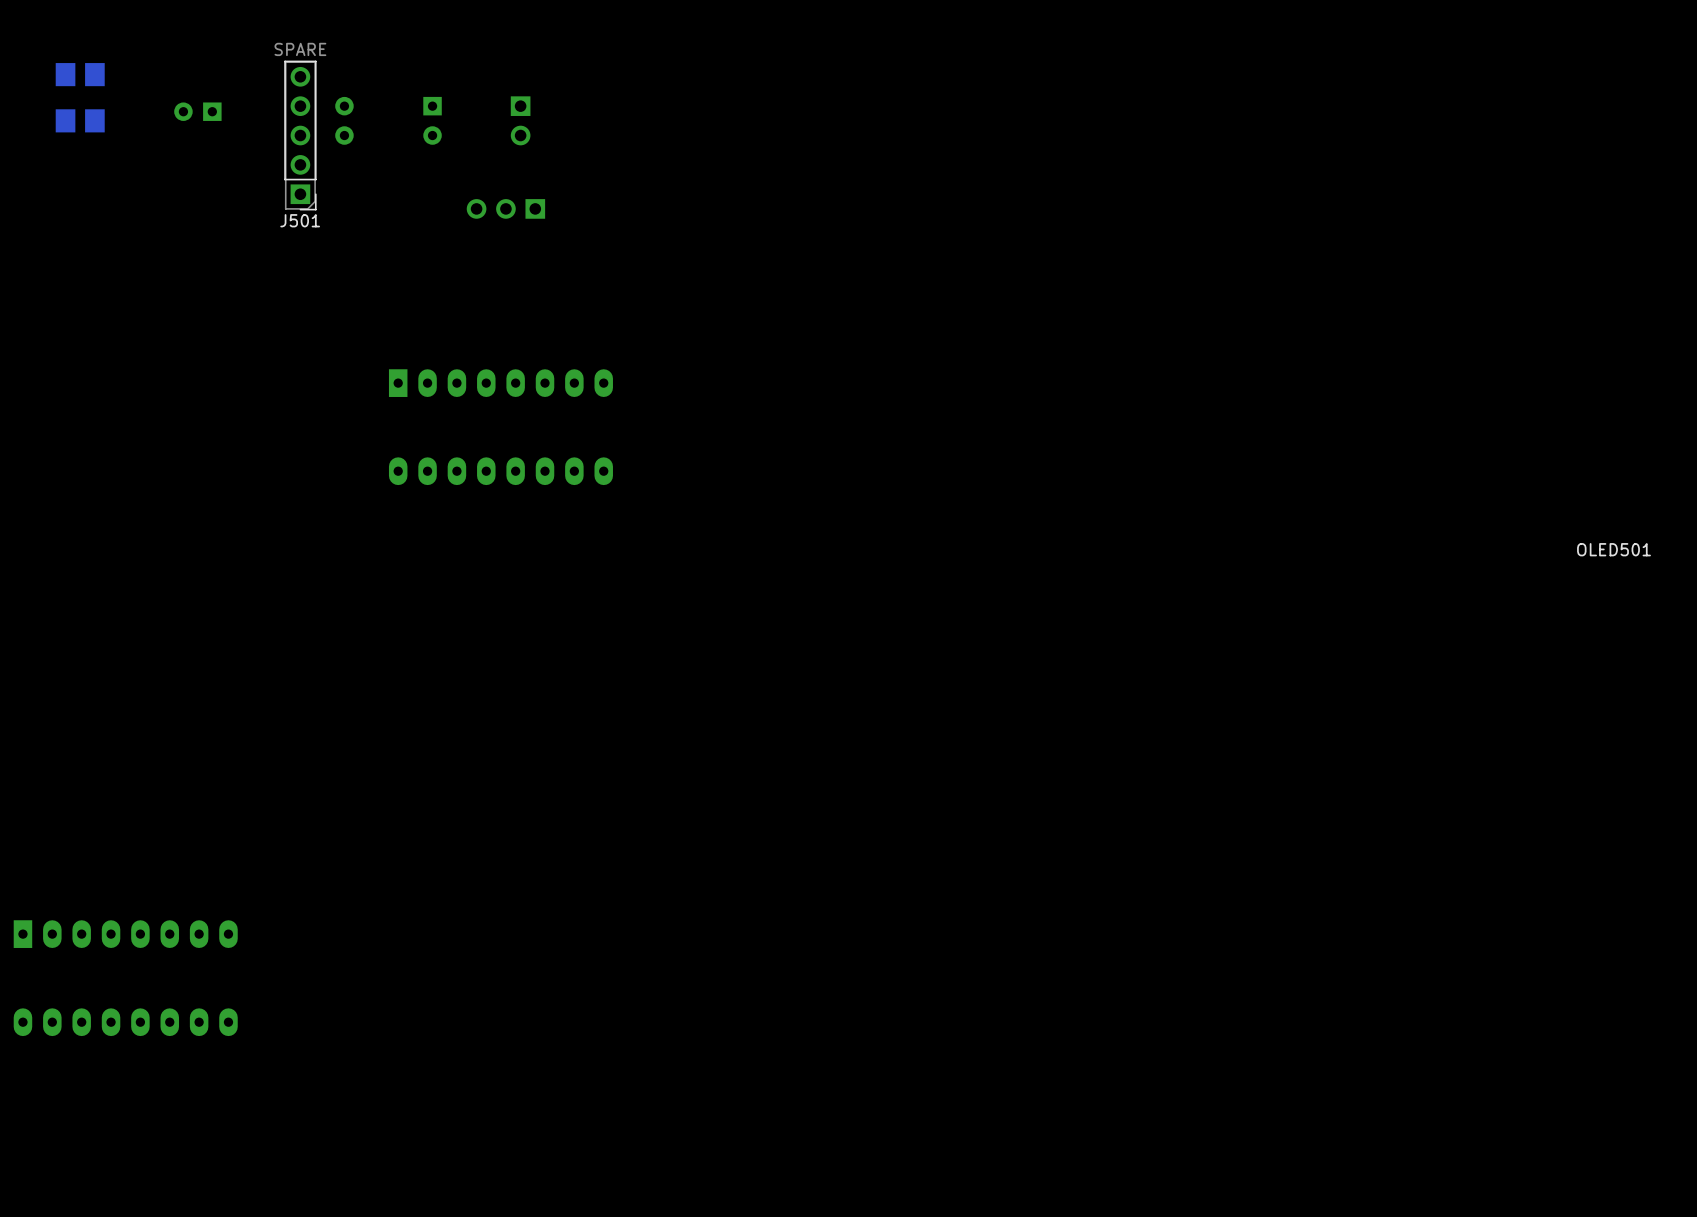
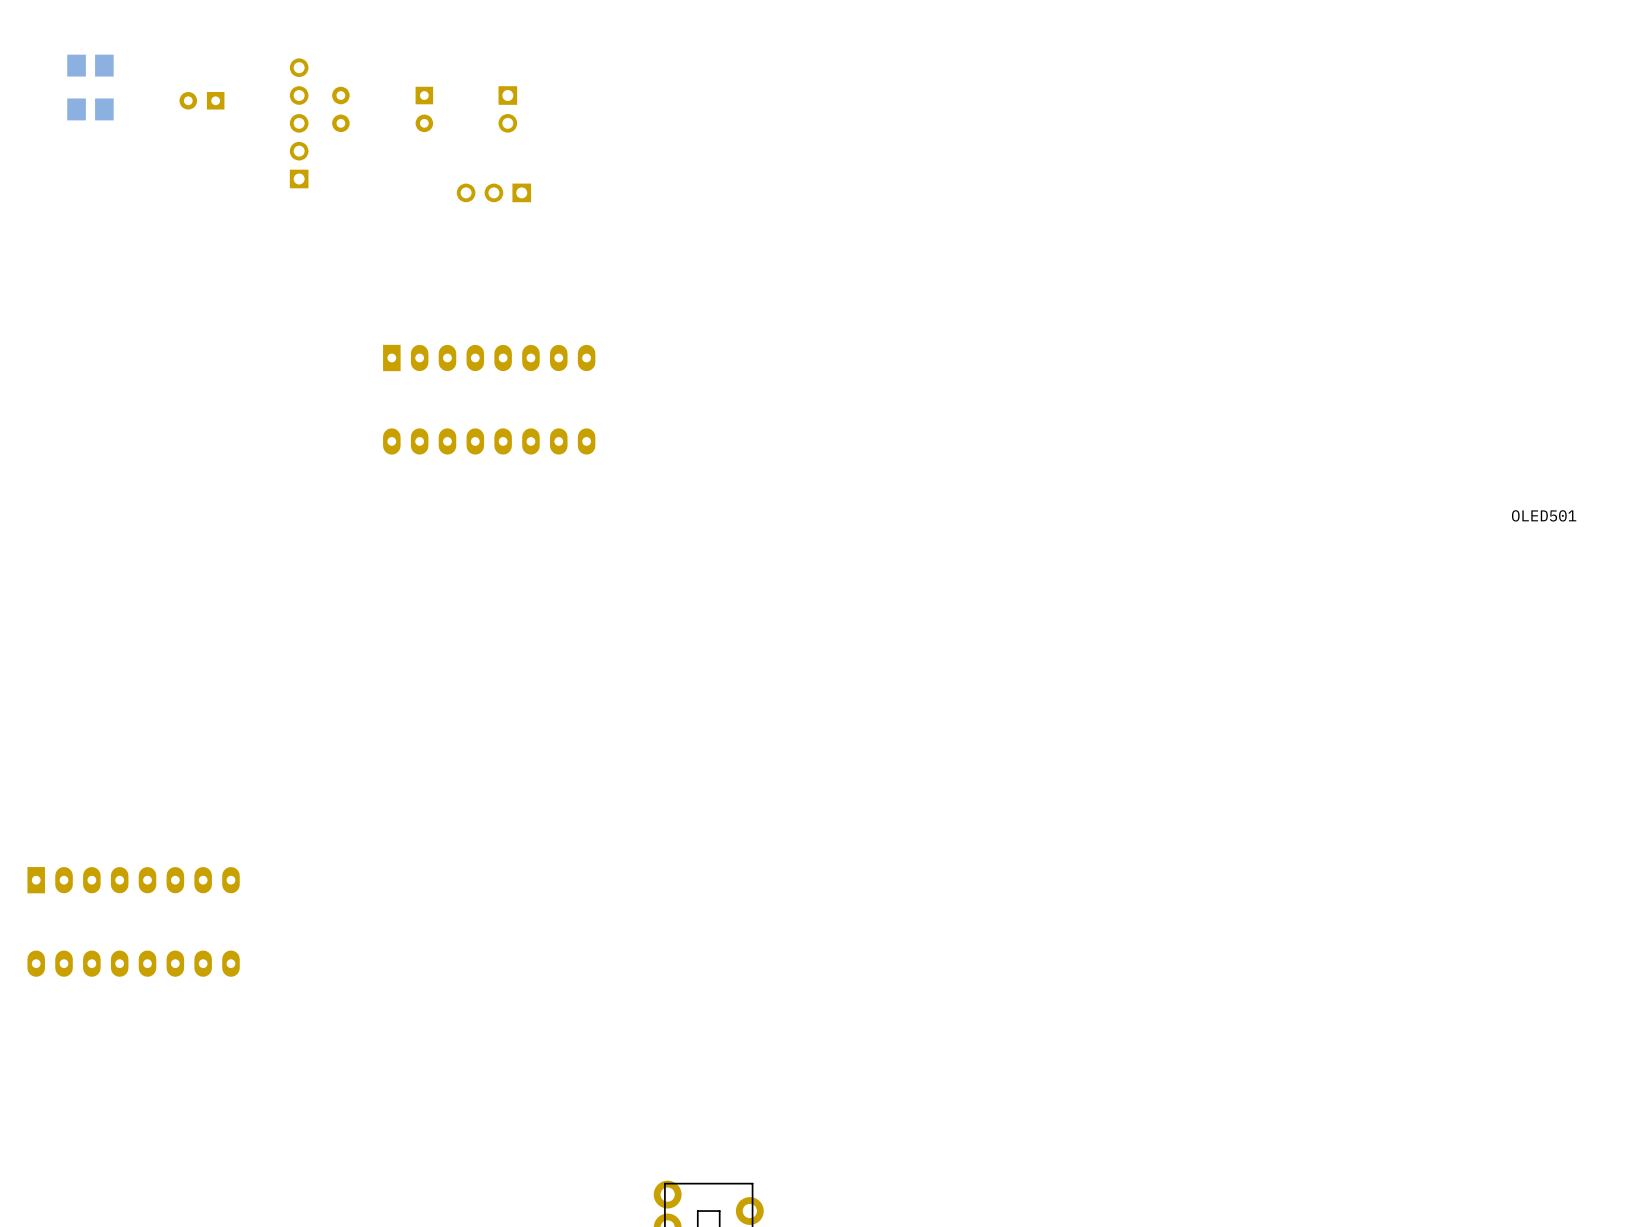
J501 side: top (300, 135) -> bottom (299, 123)

